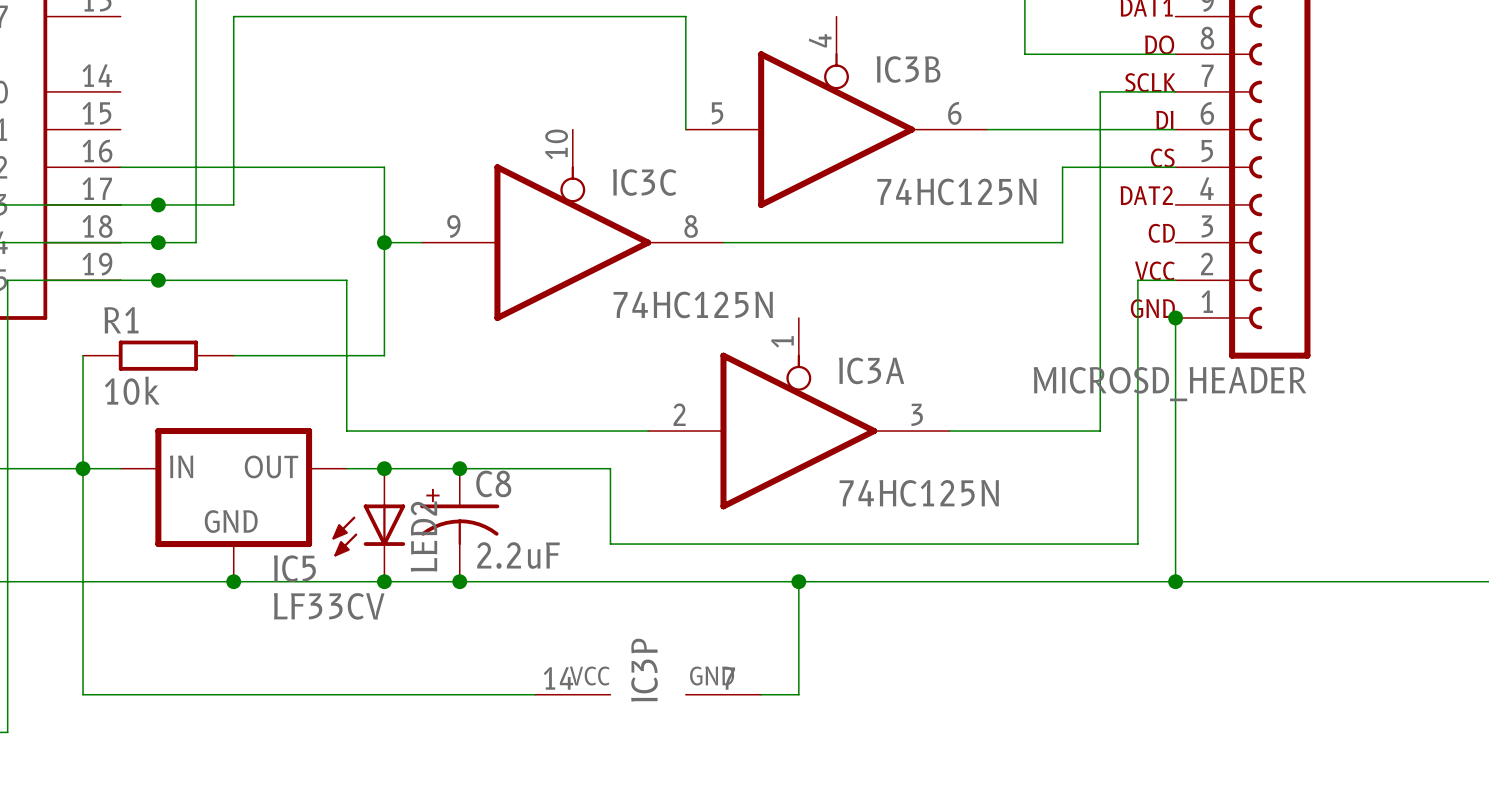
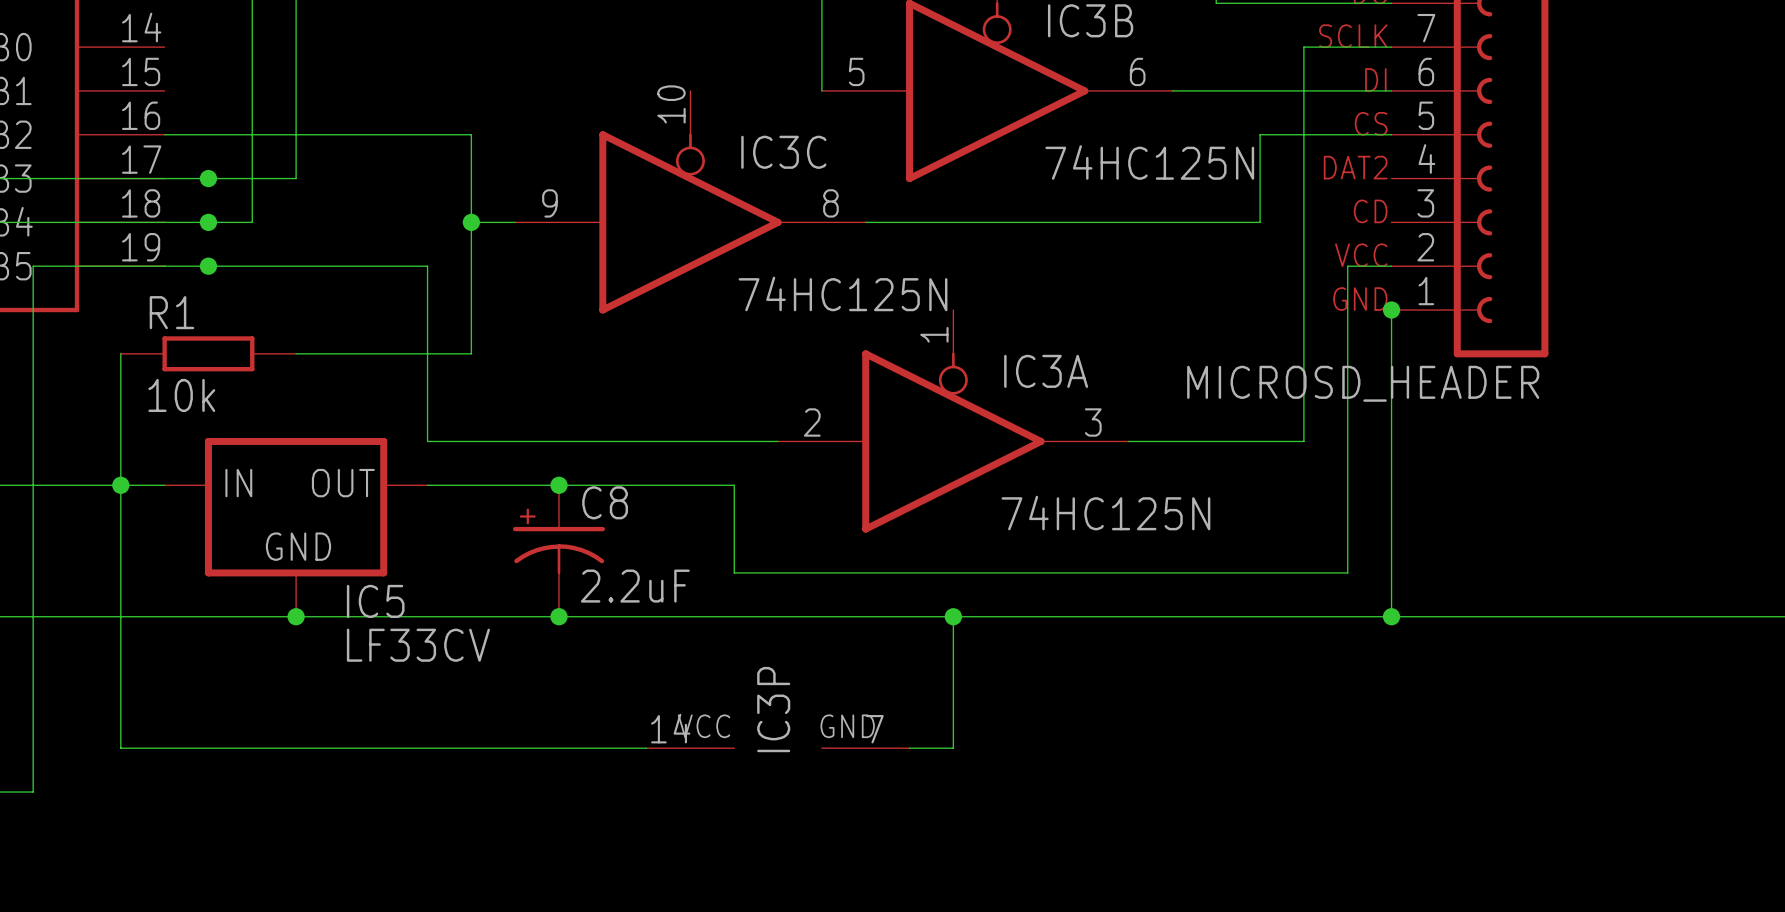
junction: (384, 468) -> none
LED2: (368, 525) -> none
junction: (384, 581) -> none

